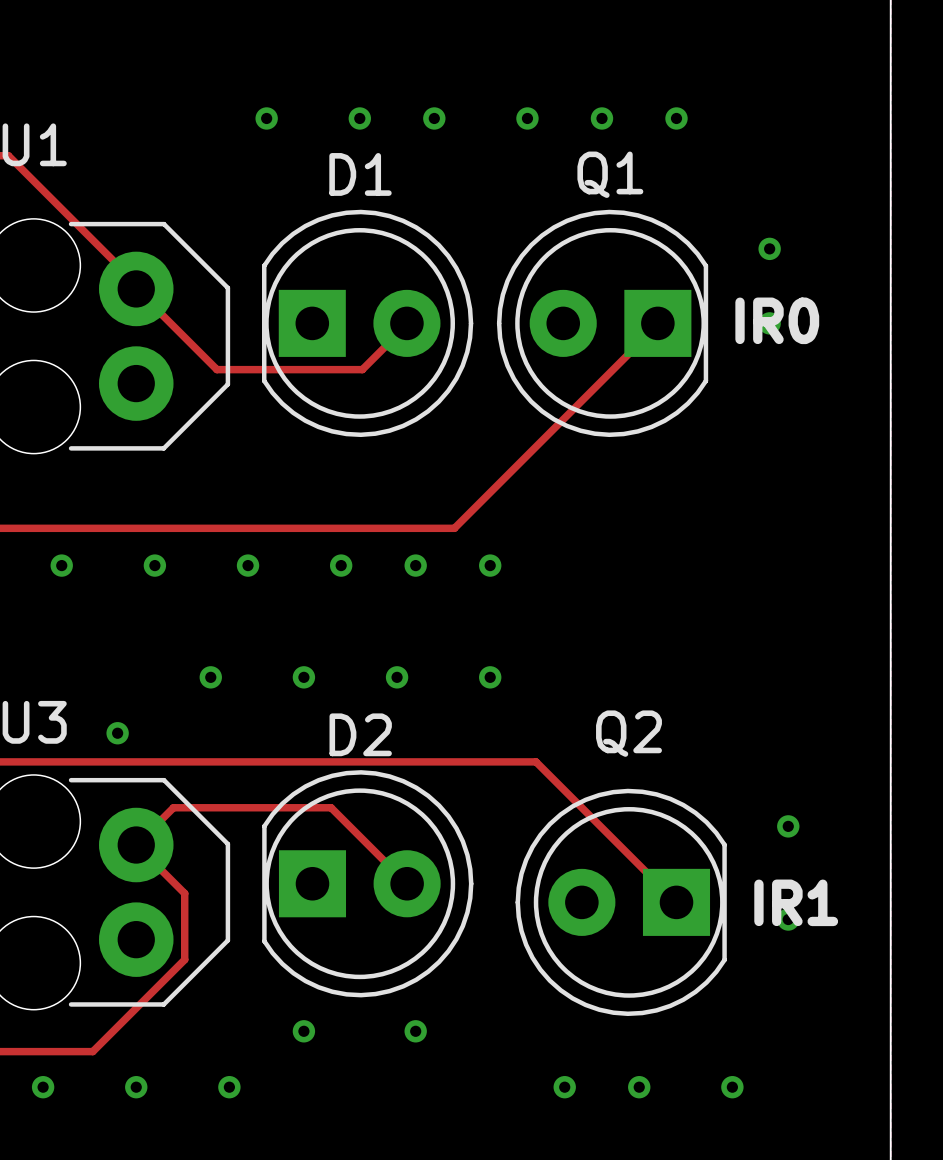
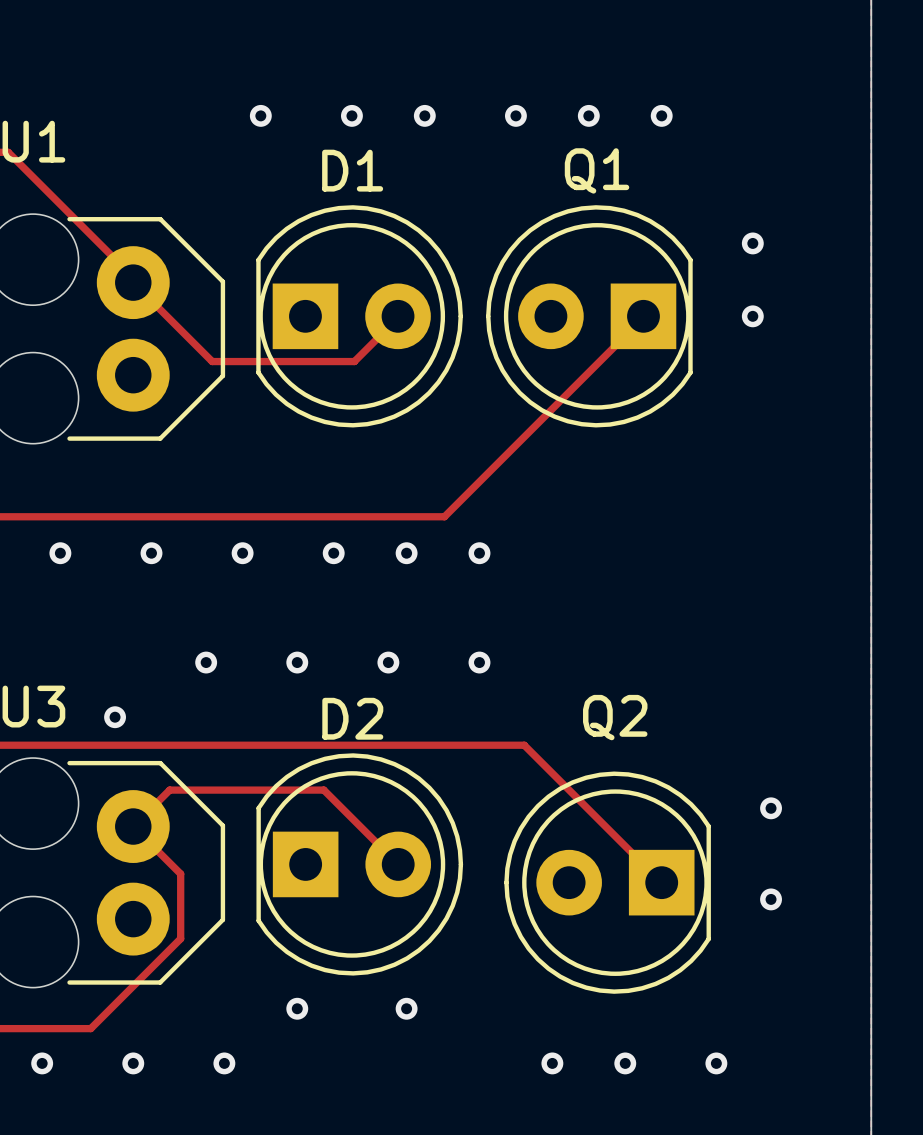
text: IR0 (777, 320) -> none
text: IR1 (796, 902) -> none

